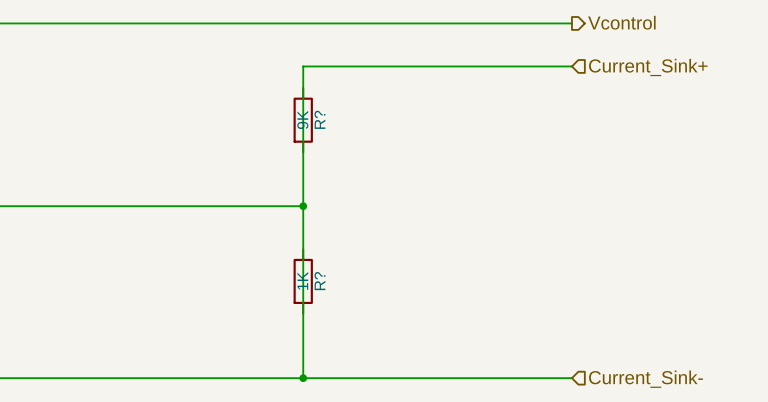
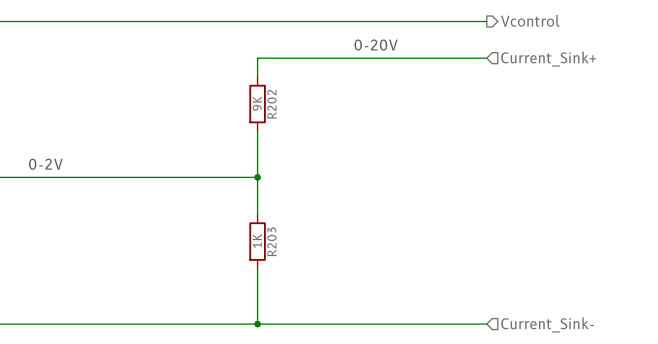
text: none -> 0-20V (376, 45)
wire: (303, 87) (303, 152) -> none
R? name: R? (319, 119) -> R202 (271, 104)
text: none -> 0-2V (45, 164)
wire: (303, 249) (303, 313) -> none
R? name: R? (319, 281) -> R203 (271, 241)

